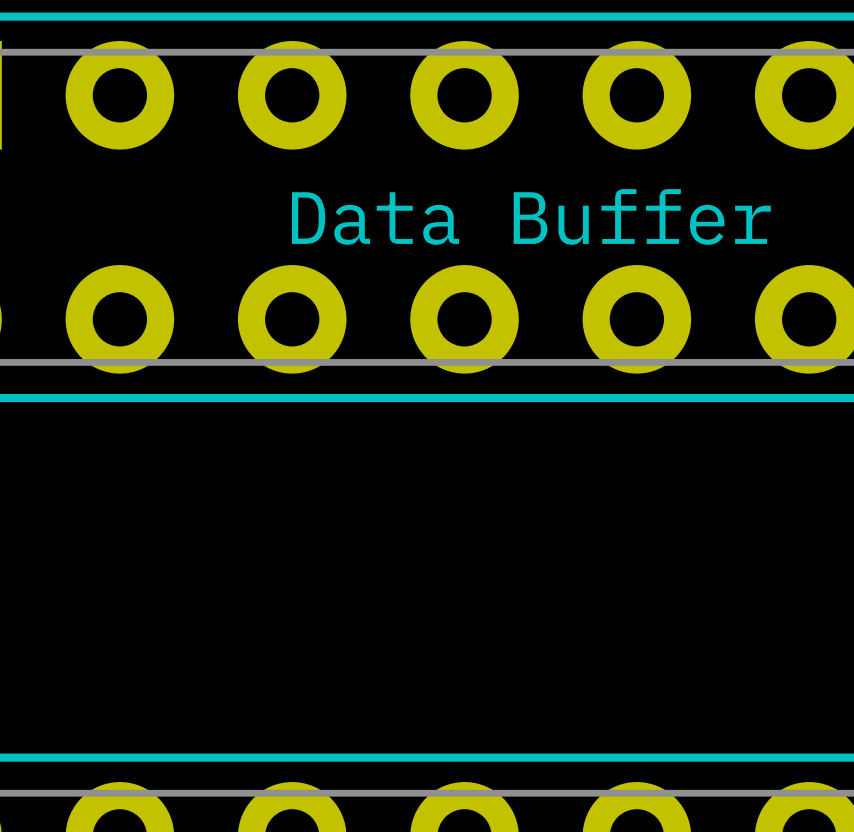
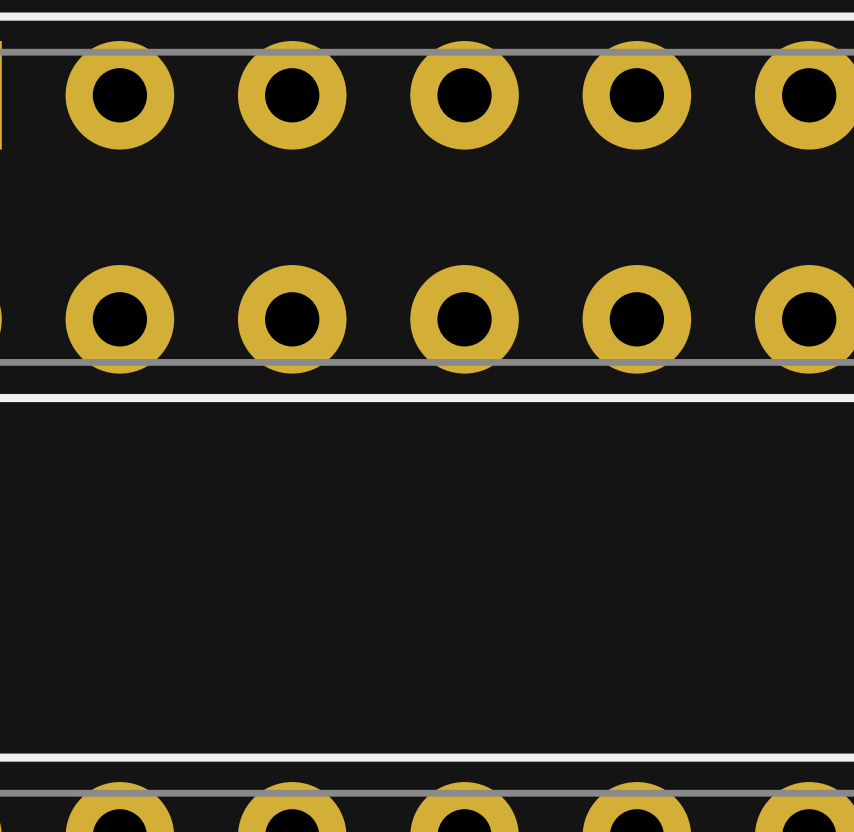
text: Data Buffer (531, 216) -> none

